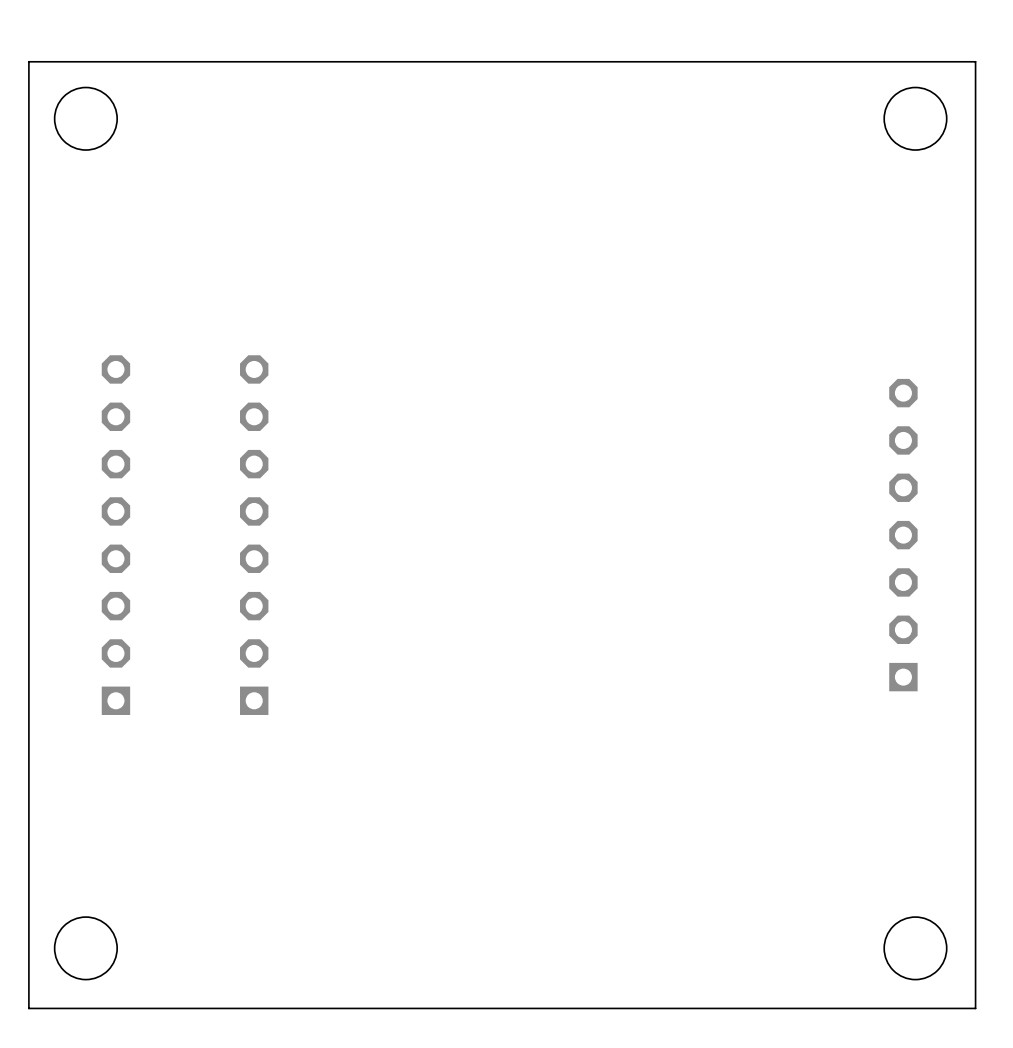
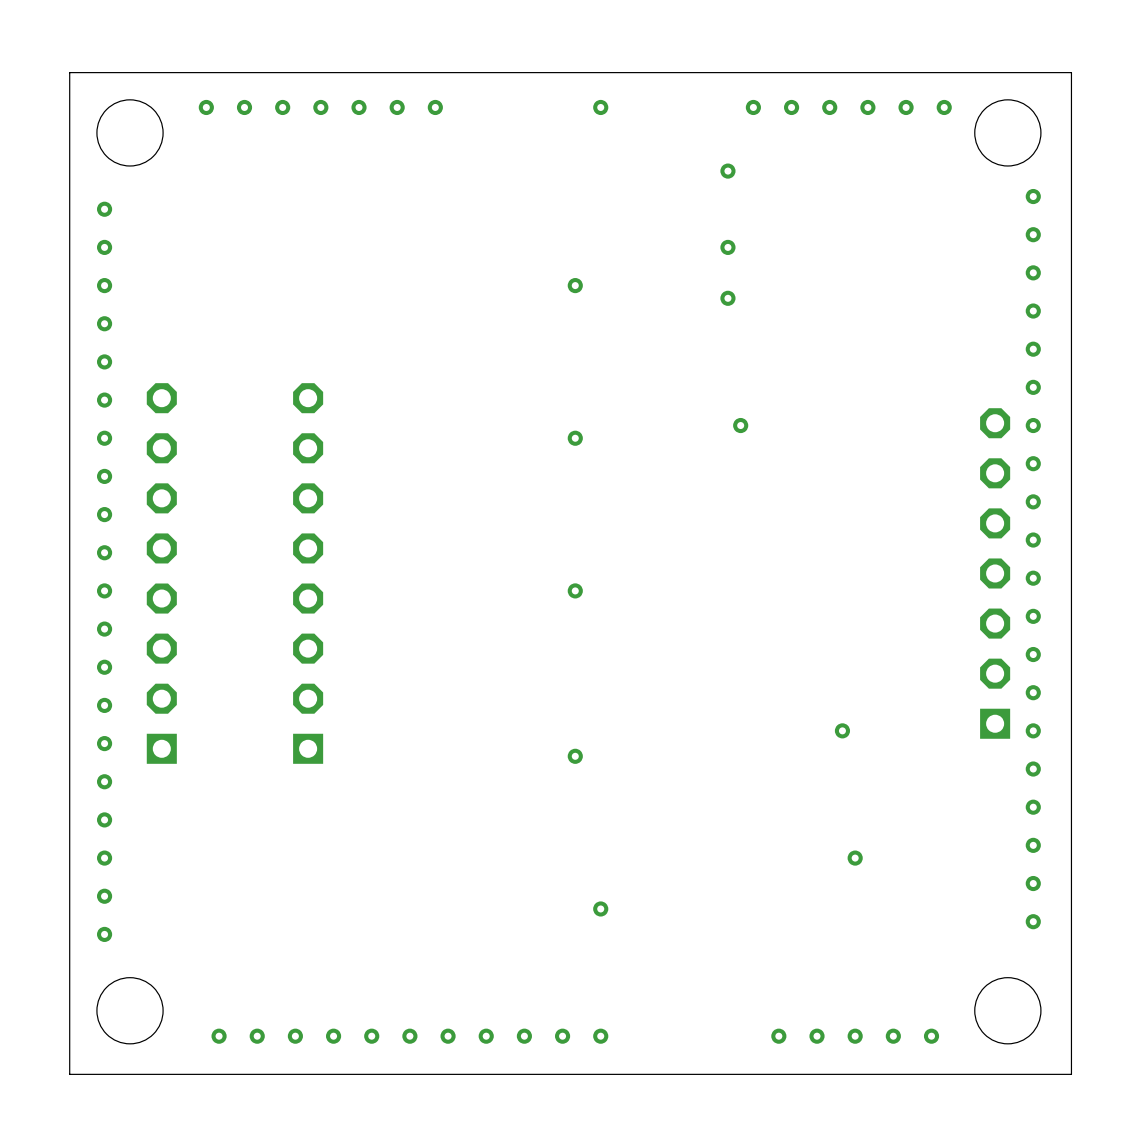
via: none -> (206, 107)
via: none -> (244, 107)
via: none -> (282, 107)
via: none -> (320, 107)
via: none -> (359, 107)
via: none -> (397, 107)
via: none -> (435, 107)
via: none -> (600, 107)
via: none -> (753, 107)
via: none -> (791, 107)
via: none -> (829, 107)
via: none -> (867, 107)
via: none -> (906, 107)
via: none -> (944, 107)
via: none -> (727, 171)
via: none -> (1033, 196)
via: none -> (104, 209)
via: none -> (1033, 234)
via: none -> (104, 247)
via: none -> (727, 247)
via: none -> (1033, 272)
via: none -> (104, 285)
via: none -> (575, 285)
via: none -> (727, 298)
via: none -> (1033, 311)
via: none -> (104, 323)
via: none -> (1033, 349)
via: none -> (104, 361)
via: none -> (1033, 387)
via: none -> (104, 400)
via: none -> (740, 425)
via: none -> (1033, 425)
via: none -> (104, 438)
via: none -> (575, 438)
via: none -> (1033, 463)
via: none -> (104, 476)
via: none -> (1033, 501)
via: none -> (104, 514)
via: none -> (1033, 540)
via: none -> (104, 552)
via: none -> (1033, 578)
via: none -> (104, 590)
via: none -> (575, 590)
via: none -> (1033, 616)
via: none -> (104, 629)
via: none -> (1033, 654)
via: none -> (104, 667)
via: none -> (1033, 692)
via: none -> (104, 705)
via: none -> (842, 730)
via: none -> (1033, 730)
via: none -> (104, 743)
via: none -> (575, 756)
via: none -> (1033, 769)
via: none -> (104, 781)
via: none -> (1033, 807)
via: none -> (104, 819)
via: none -> (1033, 845)
via: none -> (104, 858)
via: none -> (855, 858)
via: none -> (1033, 883)
via: none -> (104, 896)
via: none -> (600, 908)
via: none -> (1033, 921)
via: none -> (104, 934)
via: none -> (219, 1036)
via: none -> (257, 1036)
via: none -> (295, 1036)
via: none -> (333, 1036)
via: none -> (371, 1036)
via: none -> (409, 1036)
via: none -> (448, 1036)
via: none -> (486, 1036)
via: none -> (524, 1036)
via: none -> (562, 1036)
via: none -> (600, 1036)
via: none -> (778, 1036)
via: none -> (817, 1036)
via: none -> (855, 1036)
via: none -> (893, 1036)
via: none -> (931, 1036)

